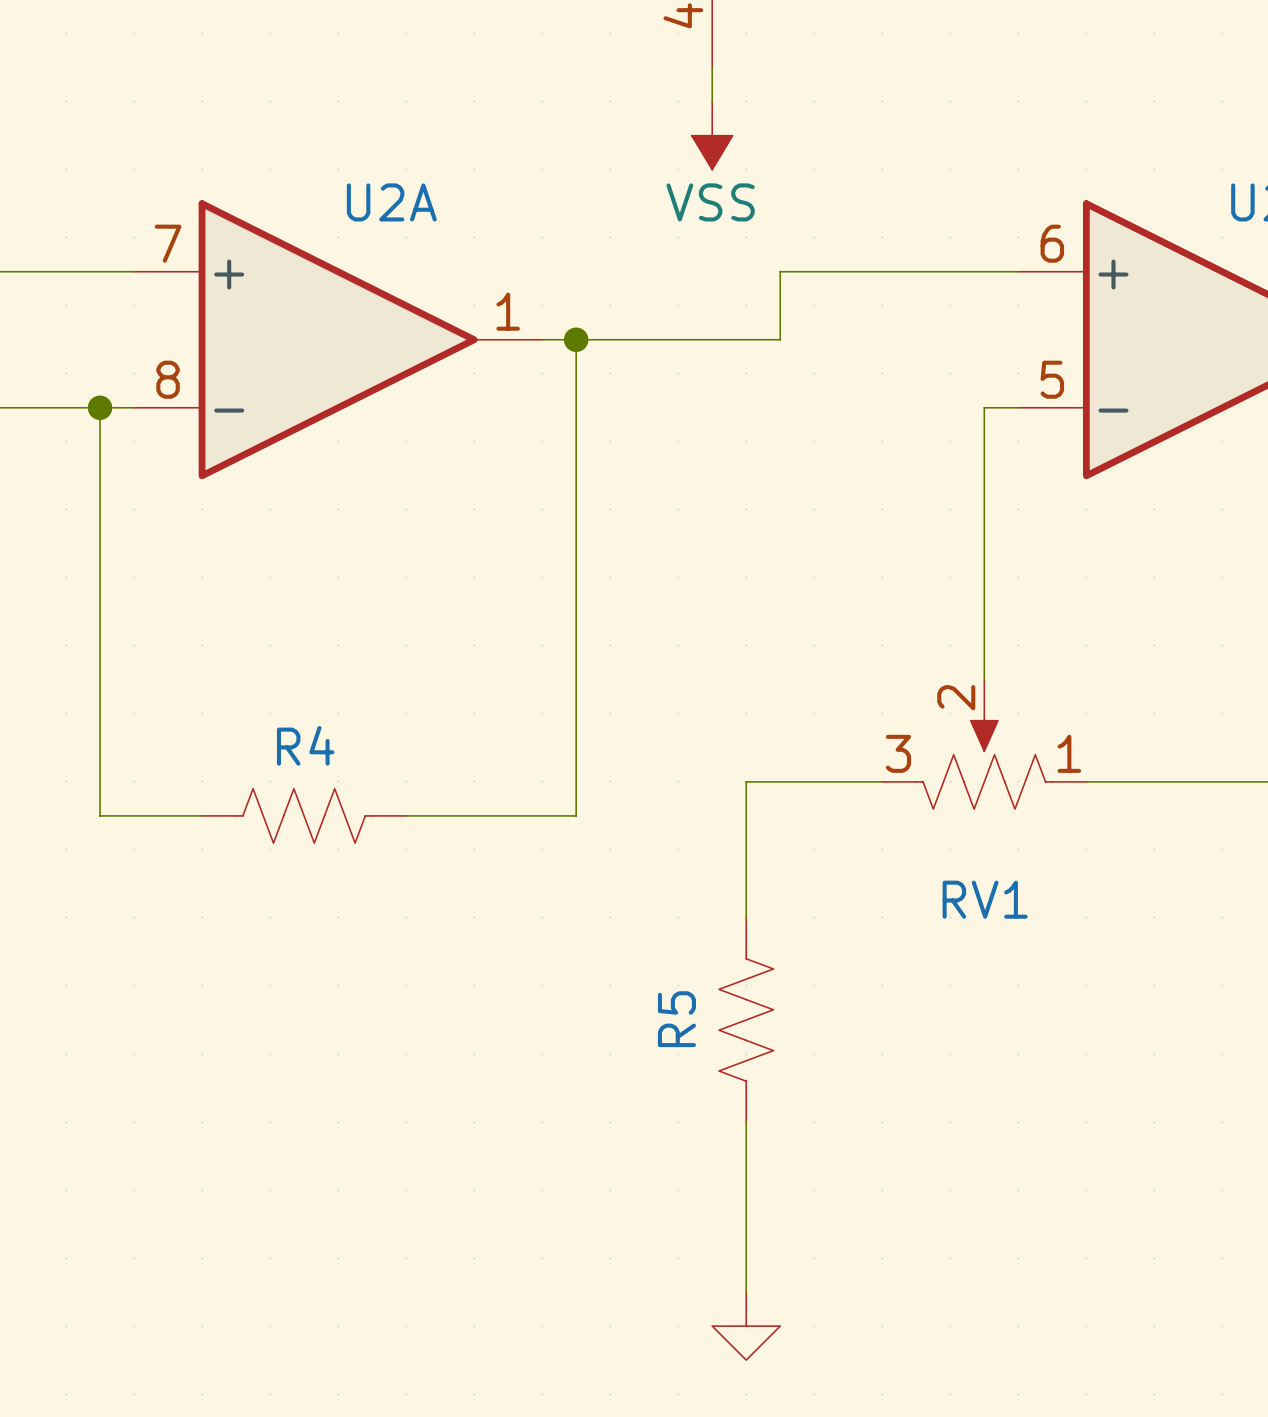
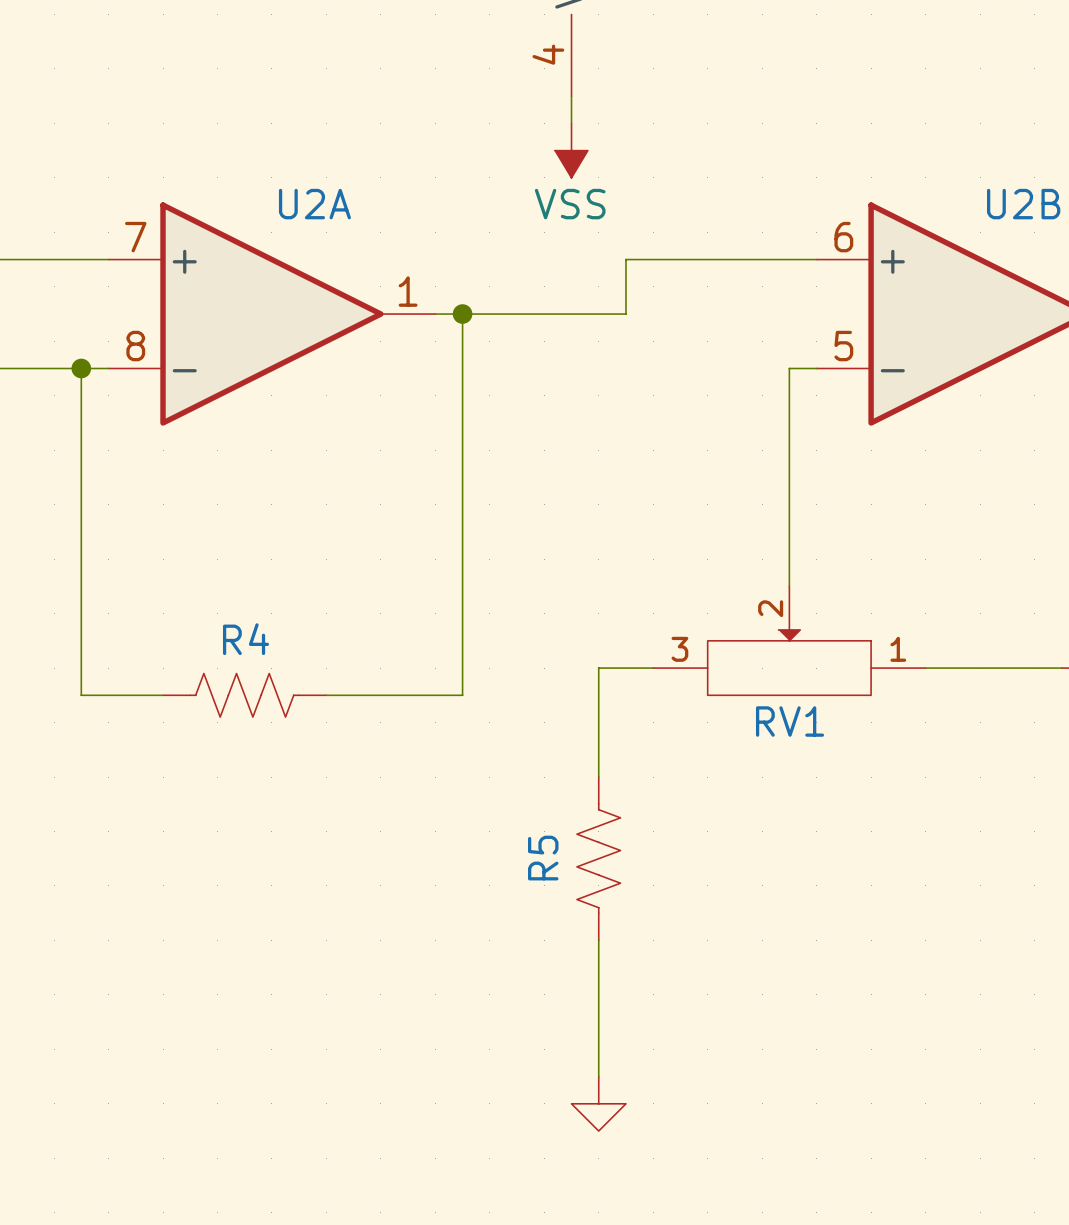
RV1 symbol: [882, 679, 1087, 810] -> [653, 586, 926, 696]
RV1 name position: RV1 (985, 899) -> RV1 (790, 721)

